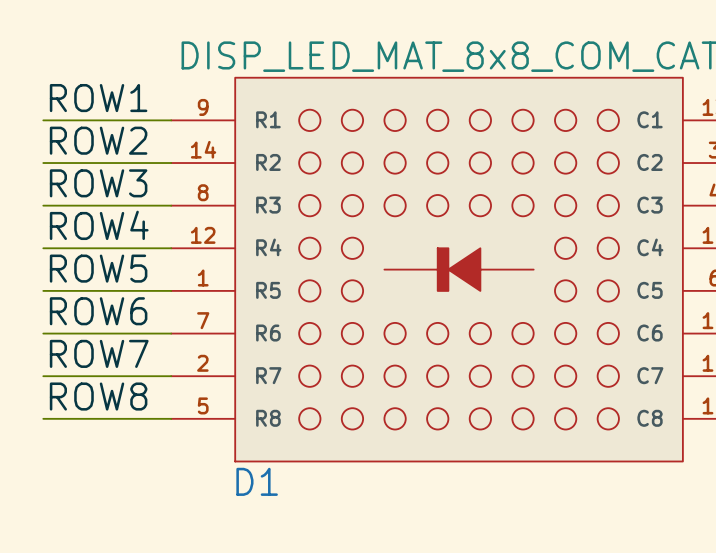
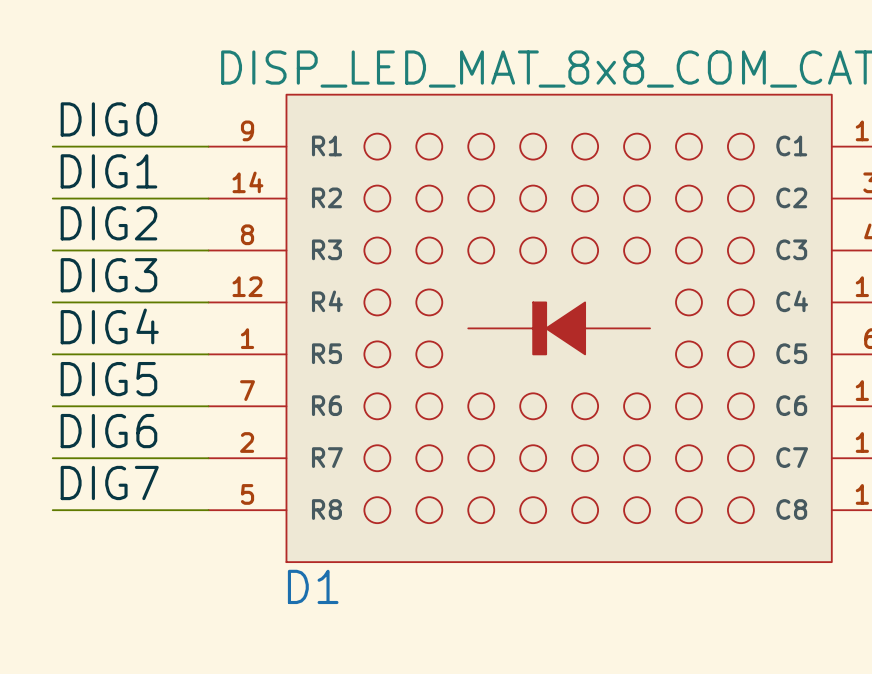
label: ROW1 (98, 98) -> DIG0 (108, 119)
label: ROW2 (98, 140) -> DIG1 (108, 171)
label: ROW3 (98, 183) -> DIG2 (108, 223)
label: ROW4 (99, 225) -> DIG3 (108, 275)
label: ROW5 (98, 268) -> DIG4 (109, 326)
label: ROW6 (98, 311) -> DIG5 (108, 379)
label: ROW7 (99, 353) -> DIG6 (108, 431)
label: ROW8 (98, 396) -> DIG7 (109, 482)

